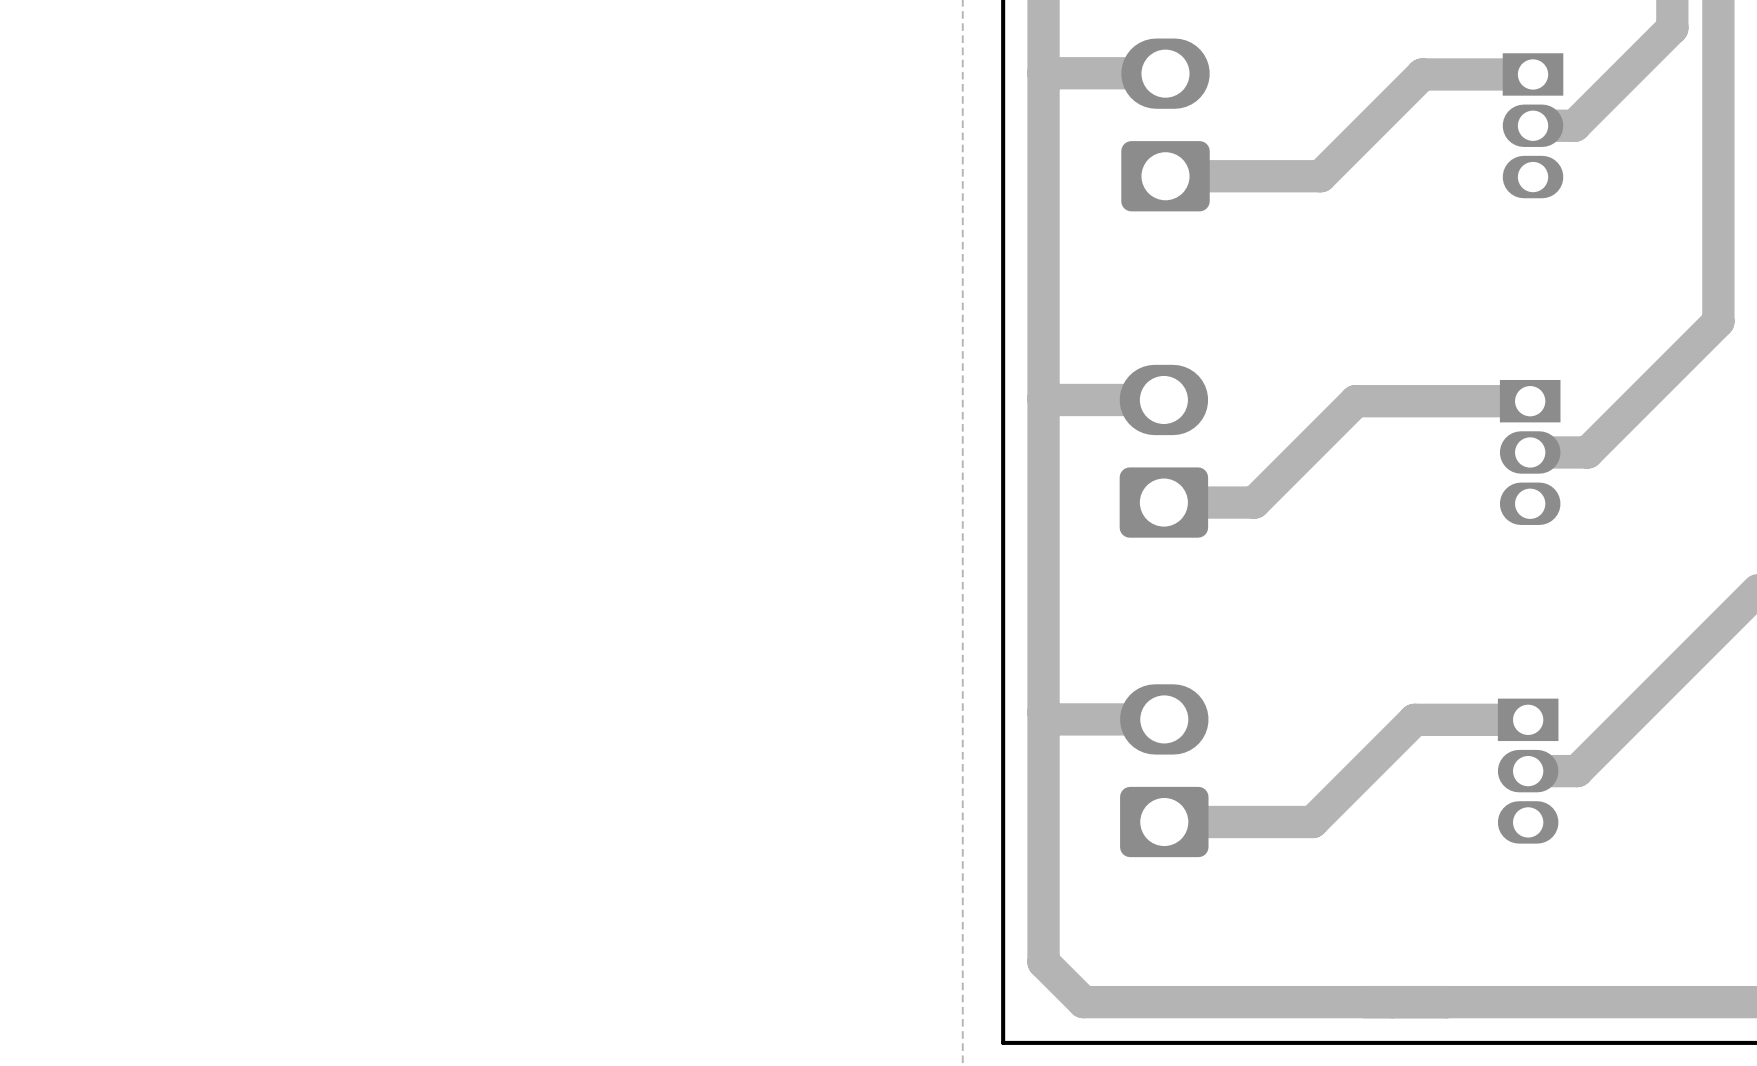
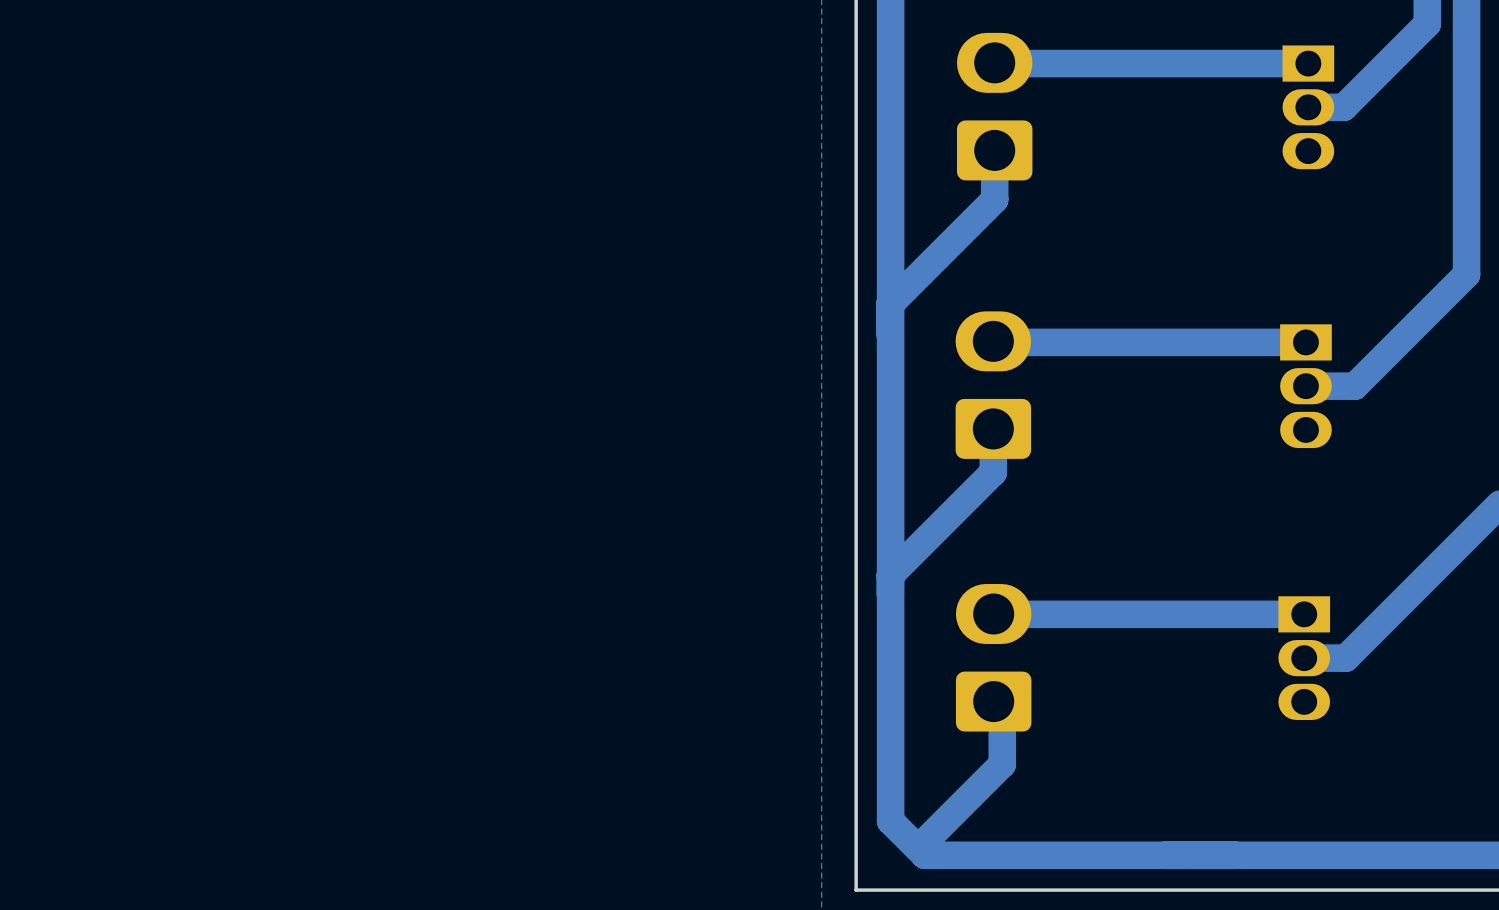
track: (1165, 73) (1043, 73) -> none
track: (1422, 74) (1320, 176) (1165, 176) -> (1213, 63) (995, 63)
track: none -> (994, 150) (994, 199) (889, 304) (889, 334)
track: (1043, 398) (1163, 399) -> none
track: (1355, 401) (1254, 502) (1163, 502) -> (1157, 342) (994, 342)
track: none -> (993, 428) (993, 472) (890, 575) (890, 594)
track: (1043, 712) (1050, 719) (1164, 719) -> none
track: (1414, 719) (1312, 822) (1164, 822) -> (1207, 614) (994, 614)
track: none -> (1002, 733) (1002, 764) (923, 842)

